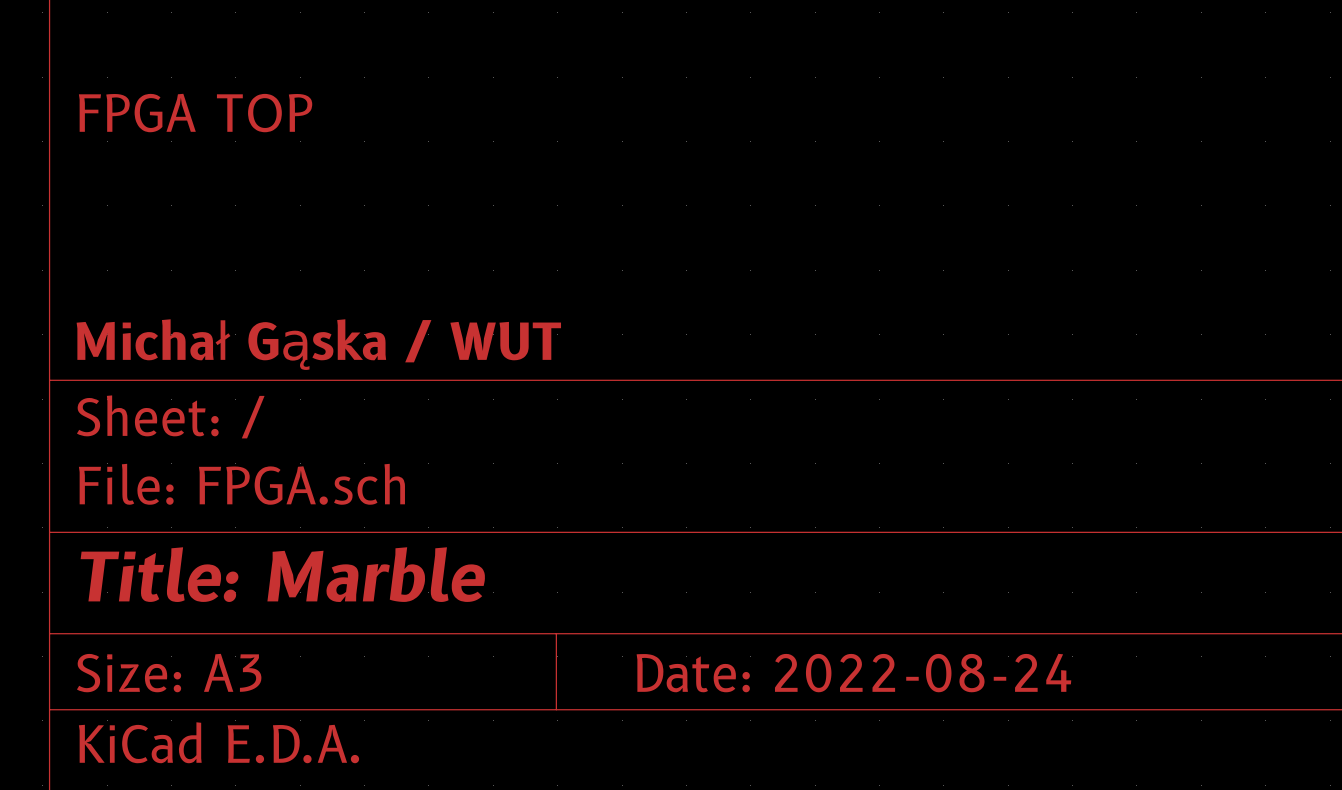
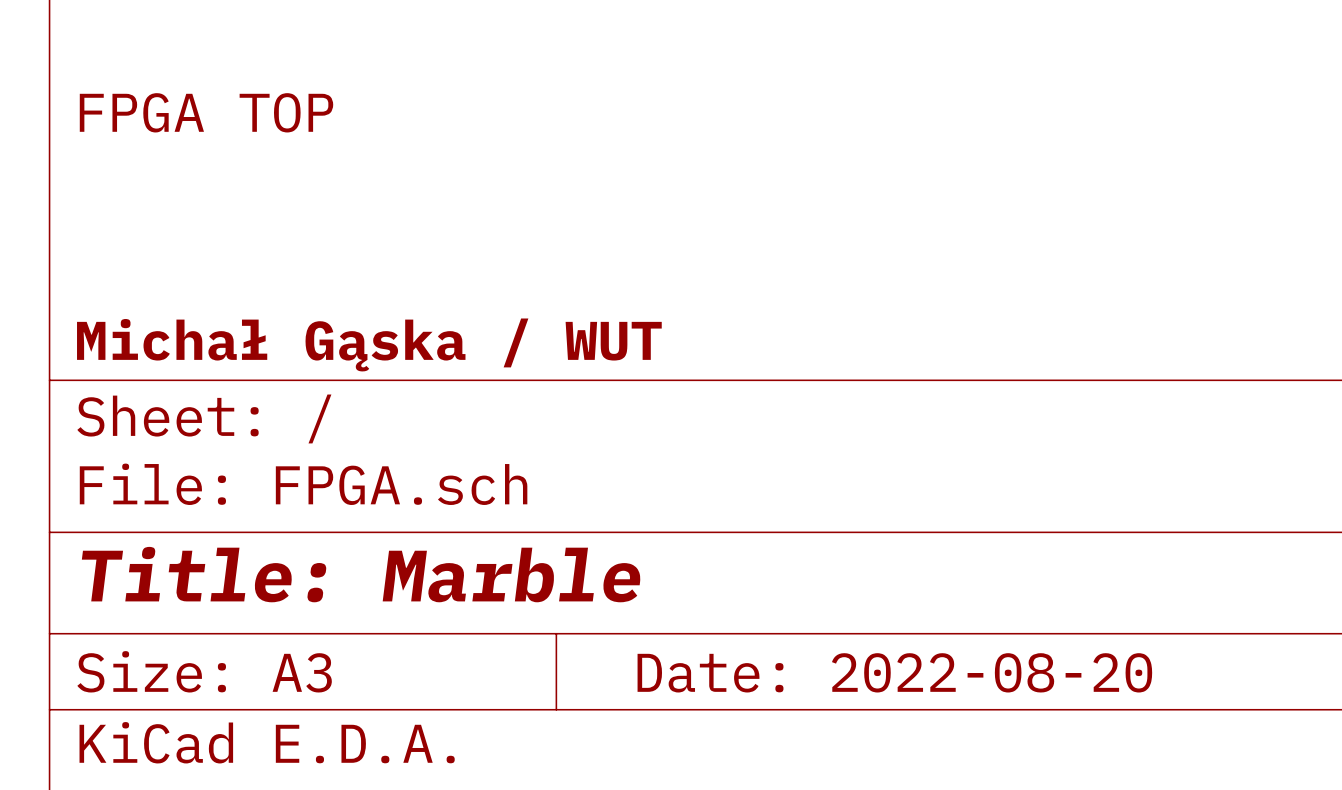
title block: Date: 2022-08-24 (853, 673) -> Date: 2022-08-20 (894, 672)

